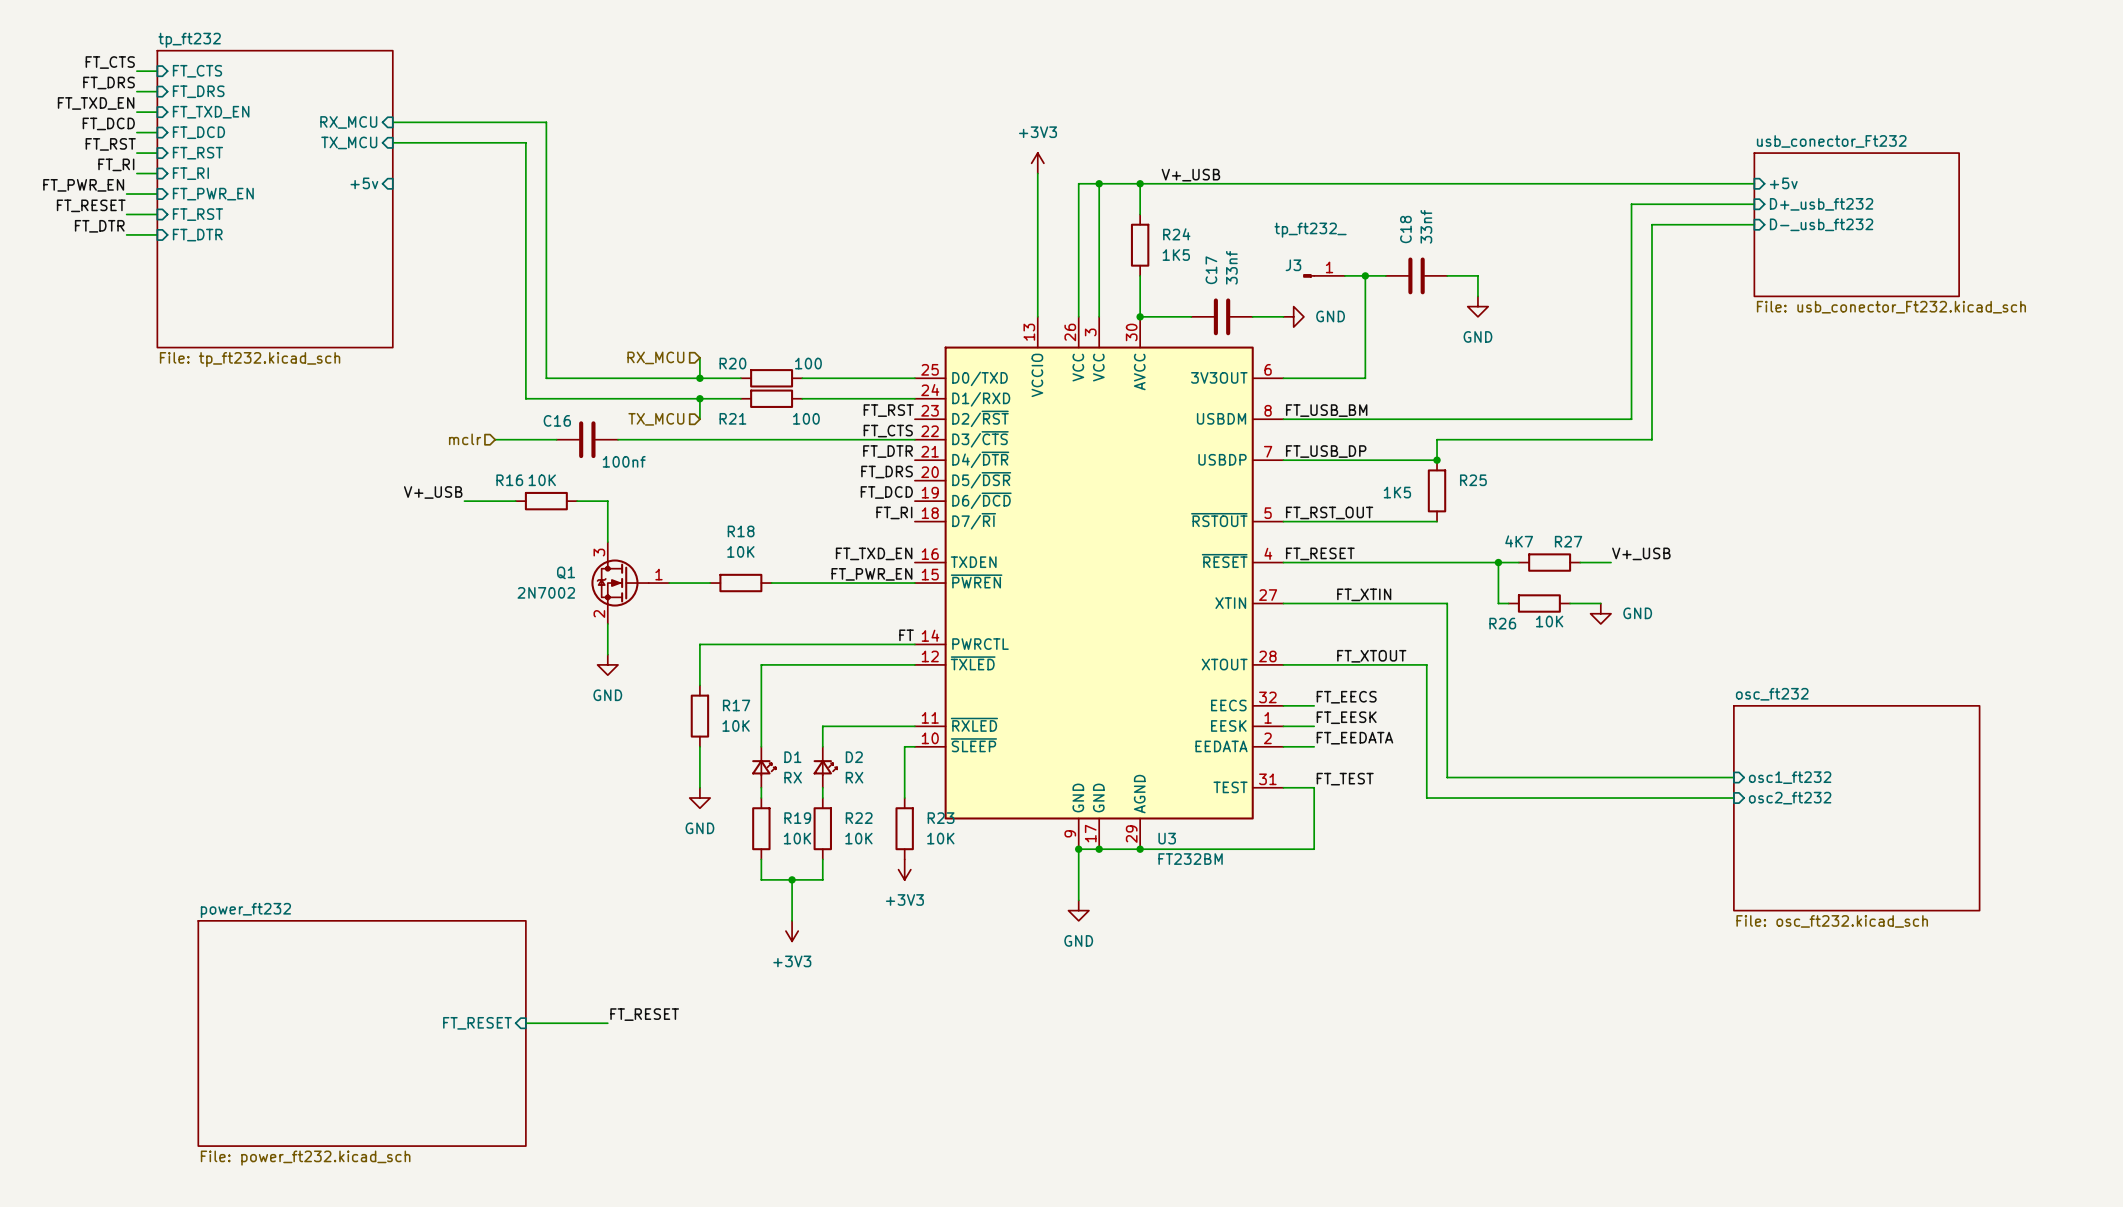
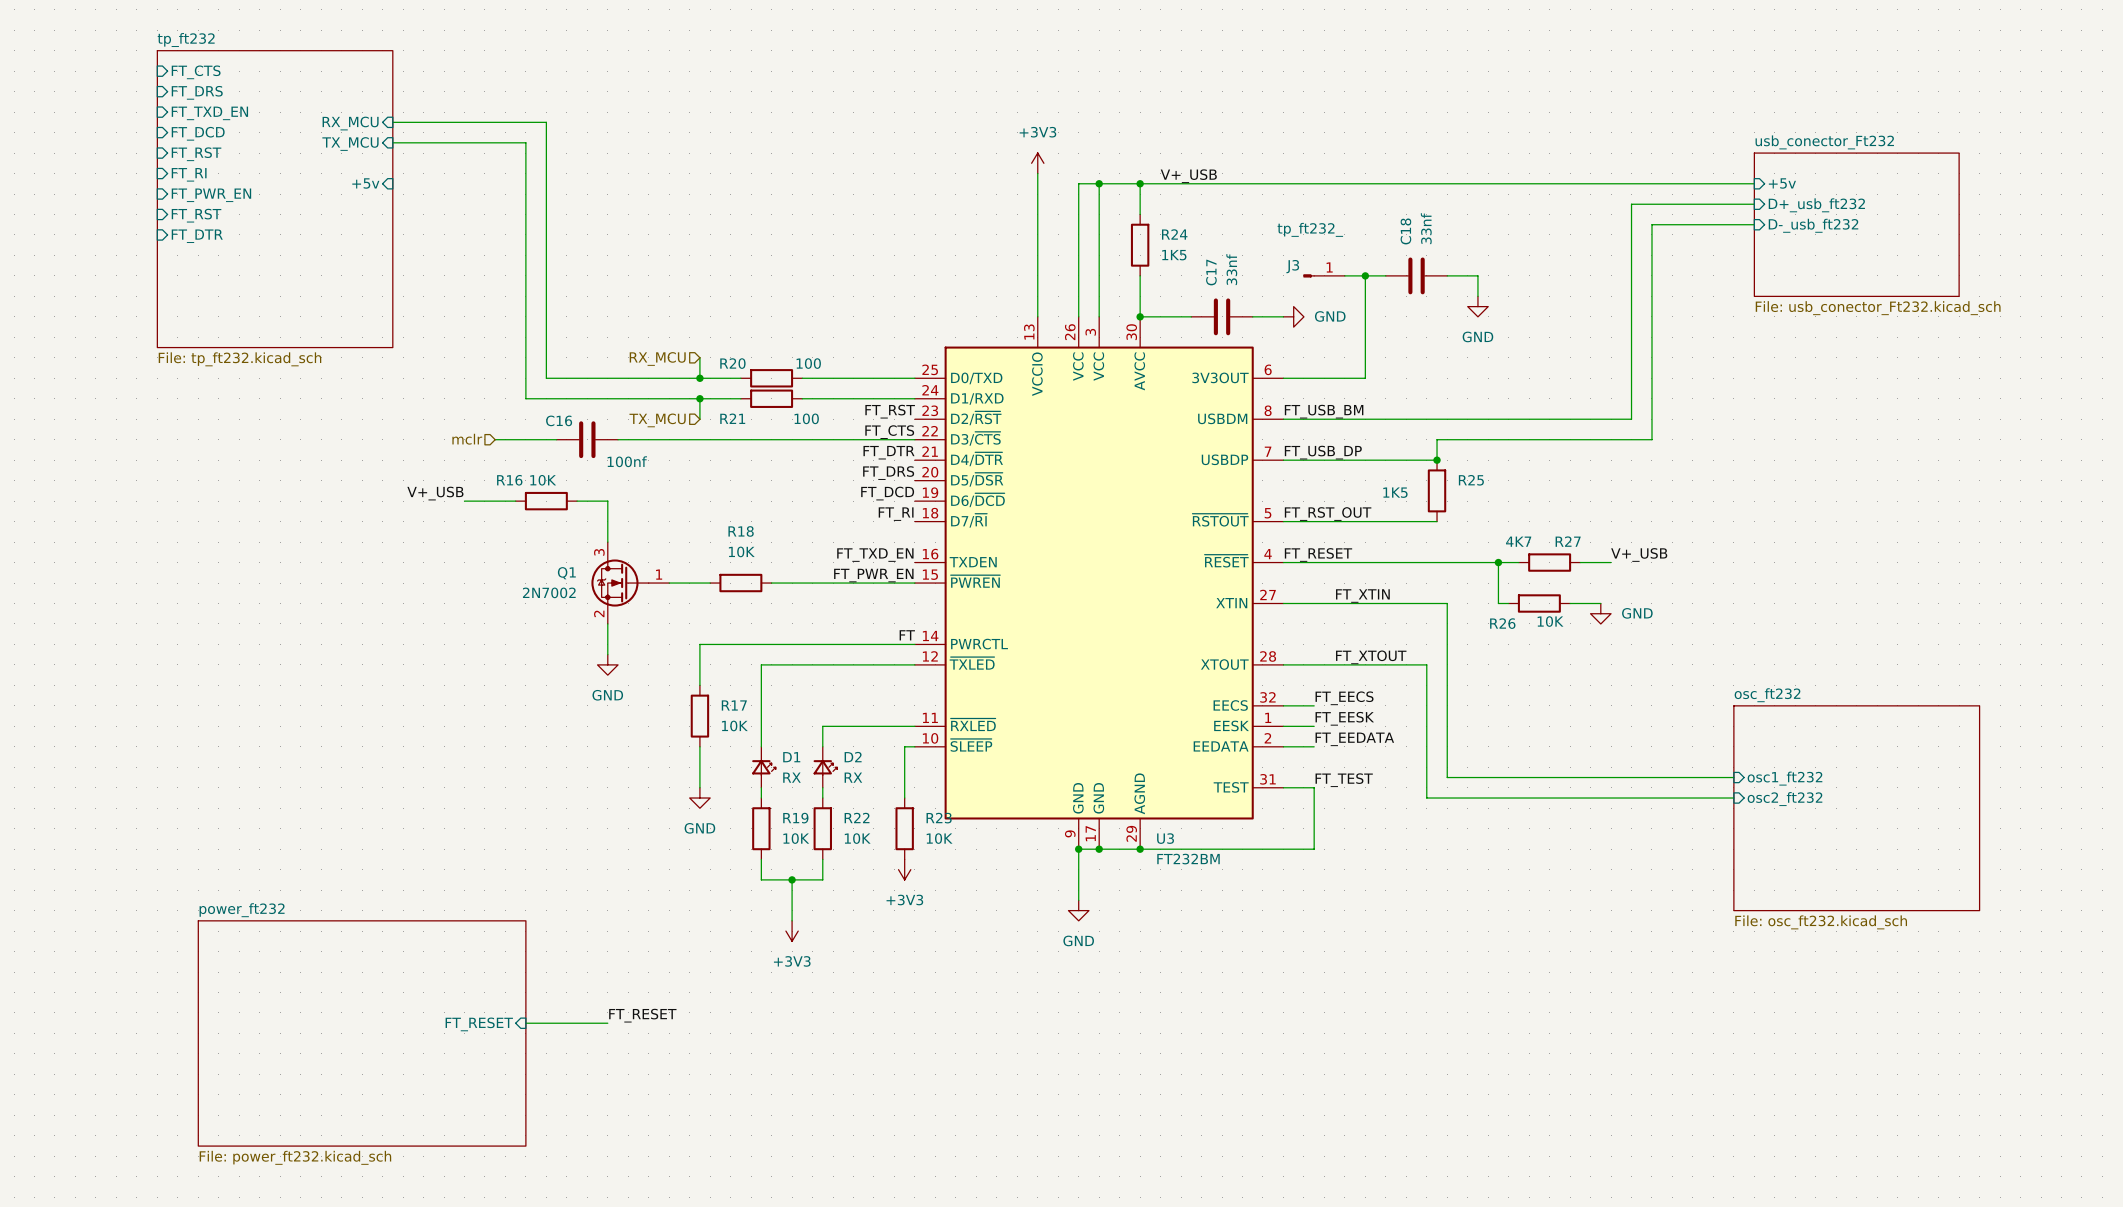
label: FT_CTS (110, 62) -> none
wire: (136, 71) (157, 71) -> none
label: FT_DRS (109, 82) -> none
wire: (136, 91) (157, 91) -> none
label: FT_TXD_EN (96, 103) -> none
wire: (136, 112) (157, 112) -> none
label: FT_DCD (108, 123) -> none
wire: (136, 132) (157, 132) -> none
label: FT_RST (110, 144) -> none
wire: (136, 153) (157, 153) -> none
label: FT_RI (116, 164) -> none
wire: (136, 173) (157, 173) -> none
label: FT_PWR_EN (83, 185) -> none
wire: (126, 194) (157, 194) -> none
label: FT_RESET (91, 205) -> none
wire: (126, 214) (157, 214) -> none
label: FT_DTR (99, 226) -> none
wire: (126, 234) (157, 234) -> none

